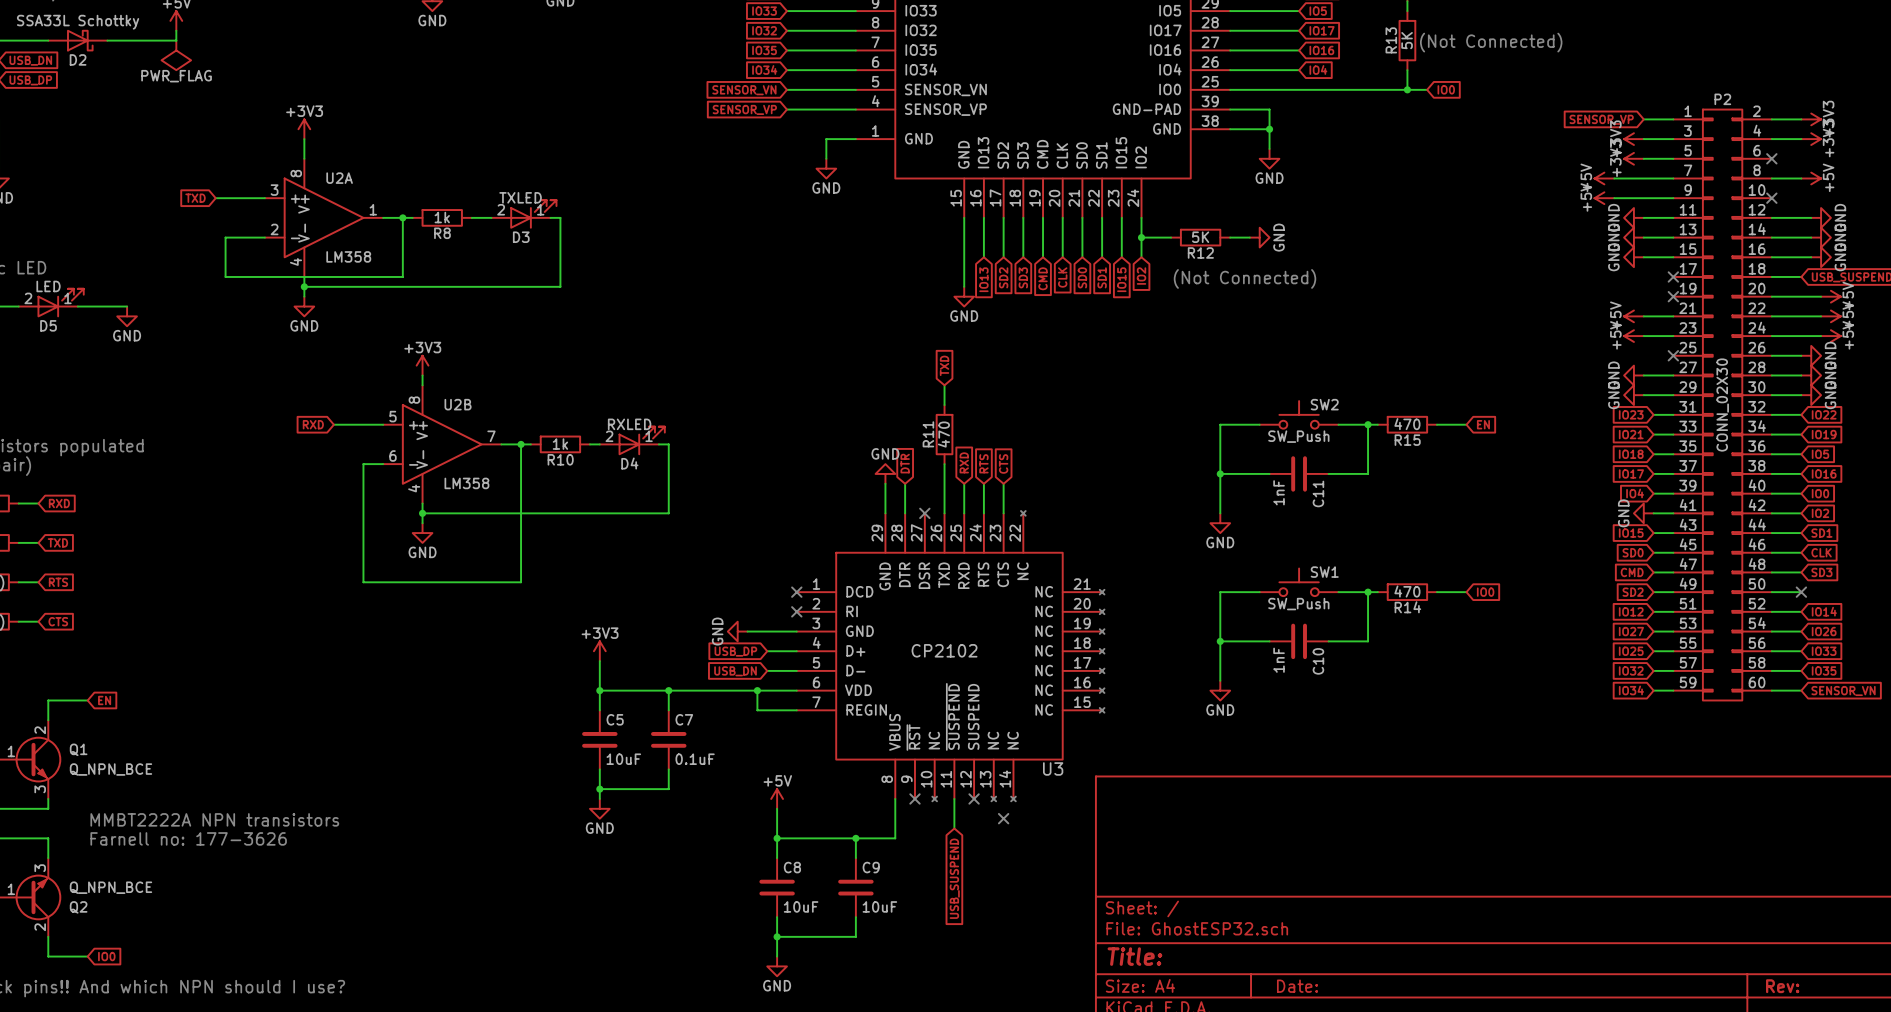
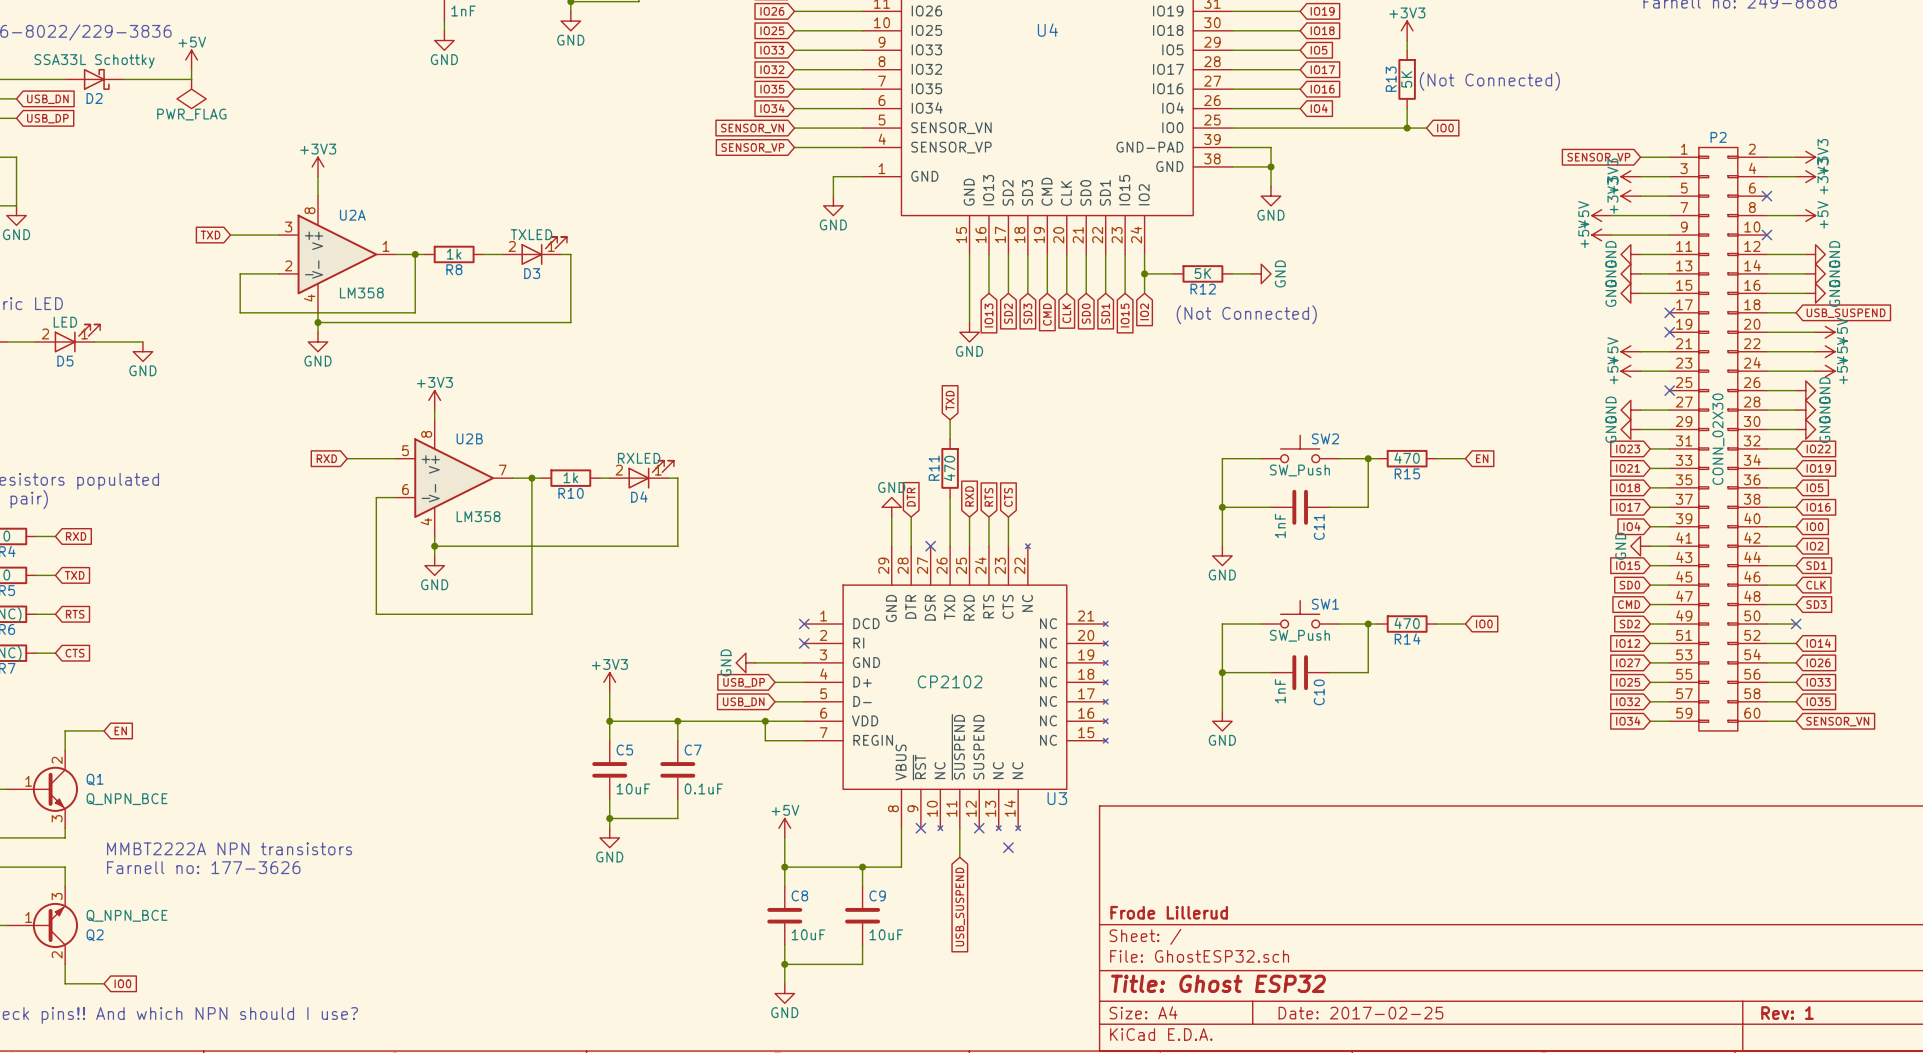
title block: none -> Frode Lillerud (1169, 912)
title block: Title: (1134, 956) -> Title: Ghost ESP32 (1218, 983)
title block: Date: (1297, 986) -> Date: 2017-02-25 (1360, 1013)
title block: Rev: (1782, 986) -> Rev: 1 (1787, 1013)

